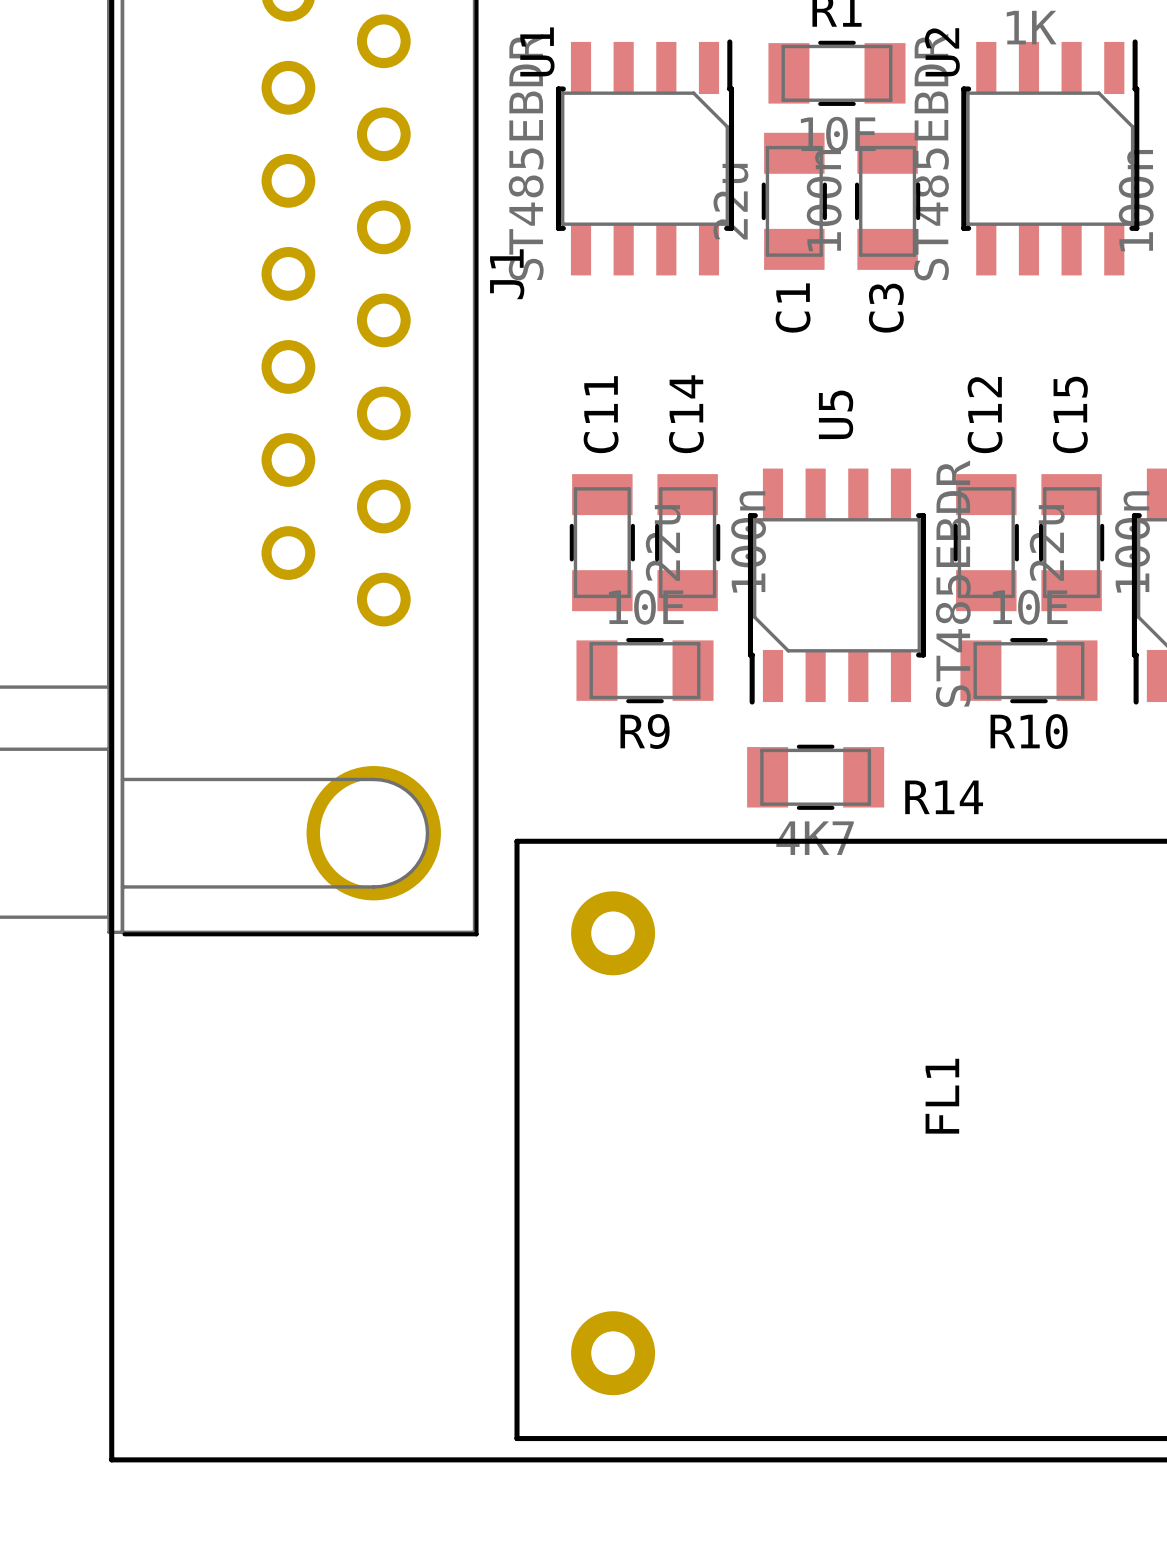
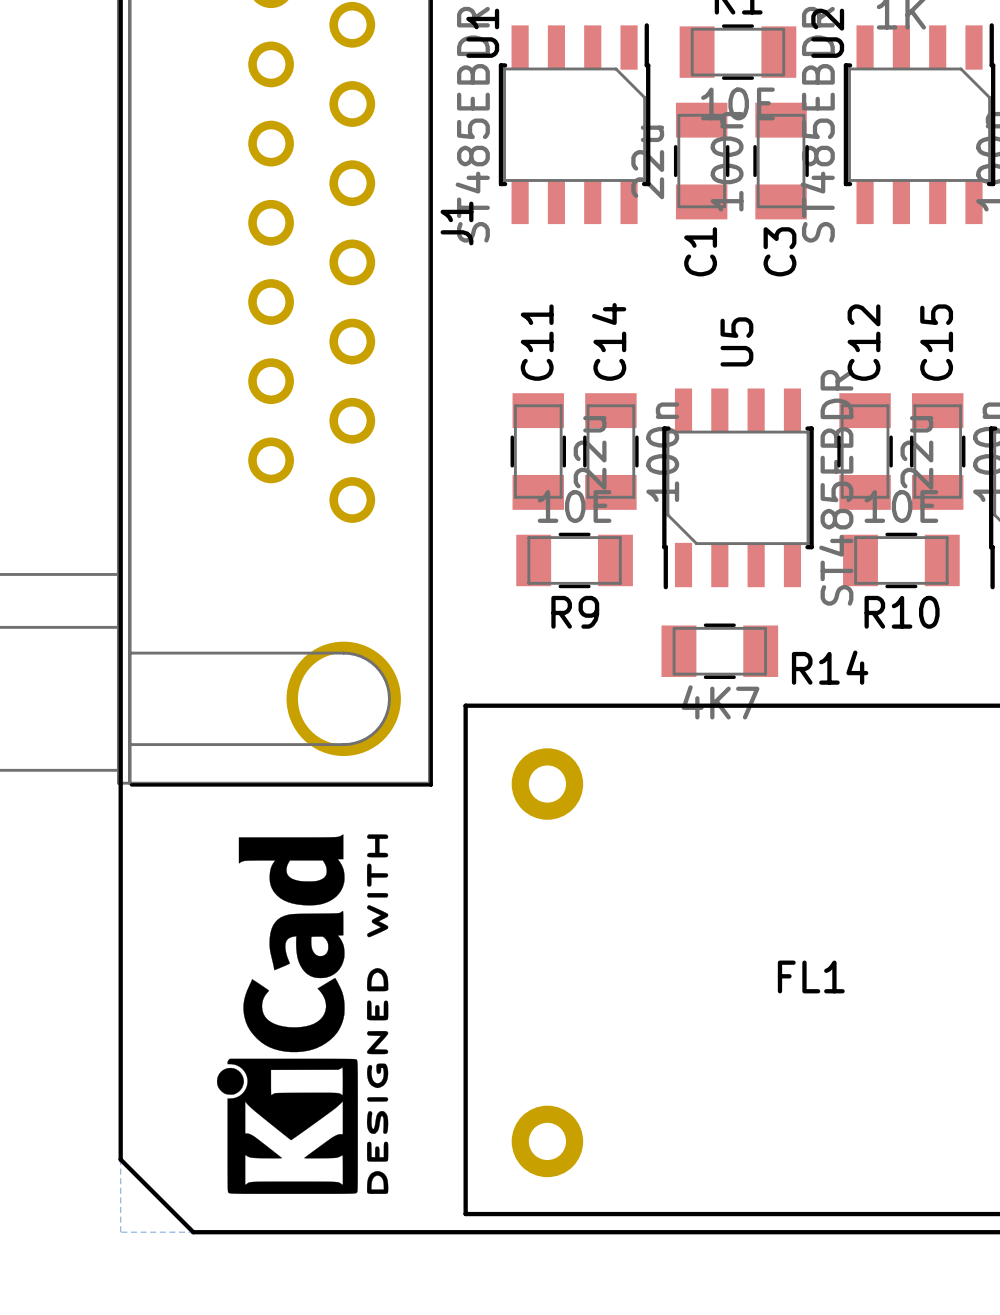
drawing: none -> [216, 834, 389, 1194]
FL1 name rotation: 0° (942, 1096) -> 90° clockwise (811, 976)
board edge: (111, 1374) (111, 1459) (197, 1459) -> (120, 1159) (193, 1232)

